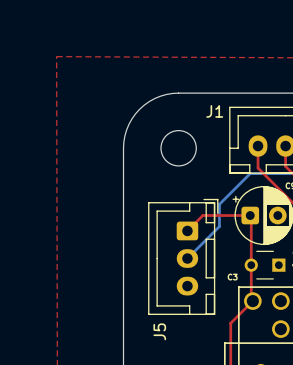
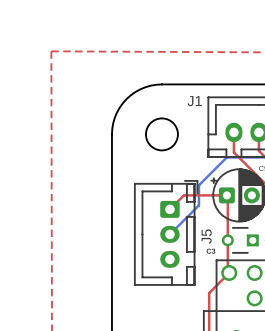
J5 name position: J5 (159, 331) -> J5 (206, 236)

